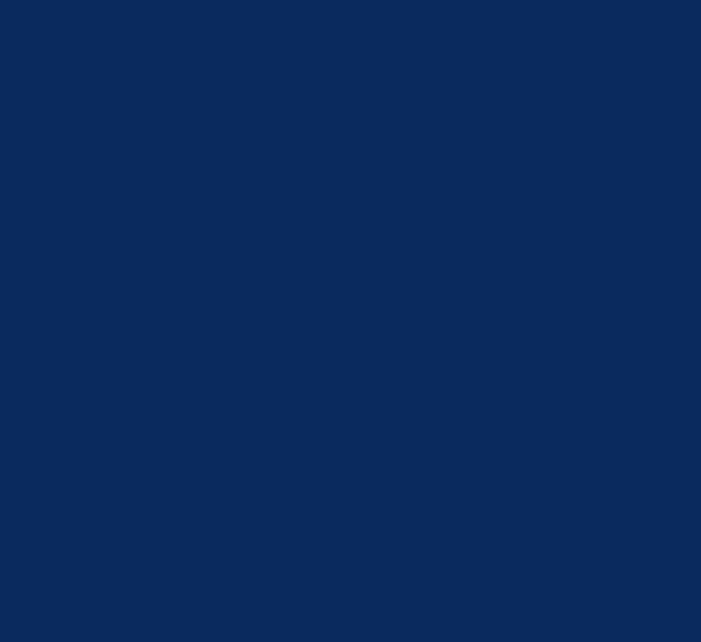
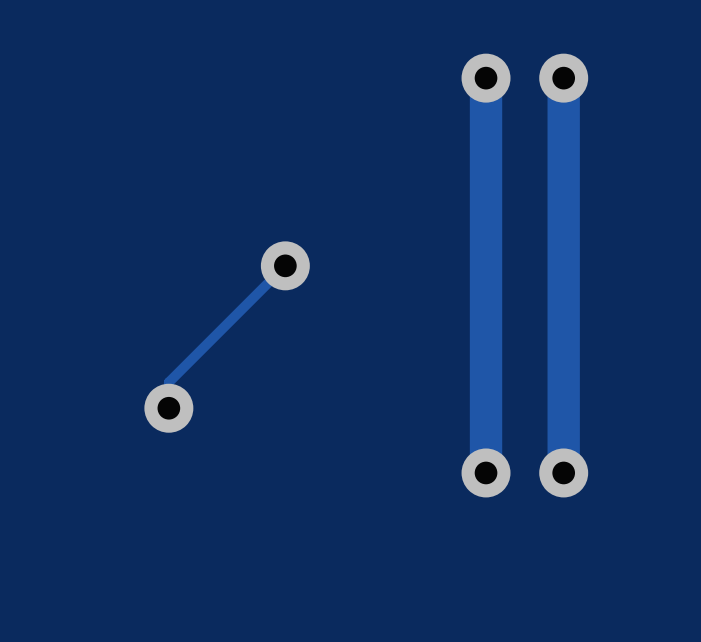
track: none -> (486, 78) (486, 472)
via: none -> (486, 78)
track: none -> (563, 78) (563, 472)
via: none -> (563, 78)
track: none -> (285, 265) (168, 382) (168, 408)
via: none -> (285, 265)
via: none -> (168, 408)
via: none -> (486, 472)
via: none -> (563, 472)

